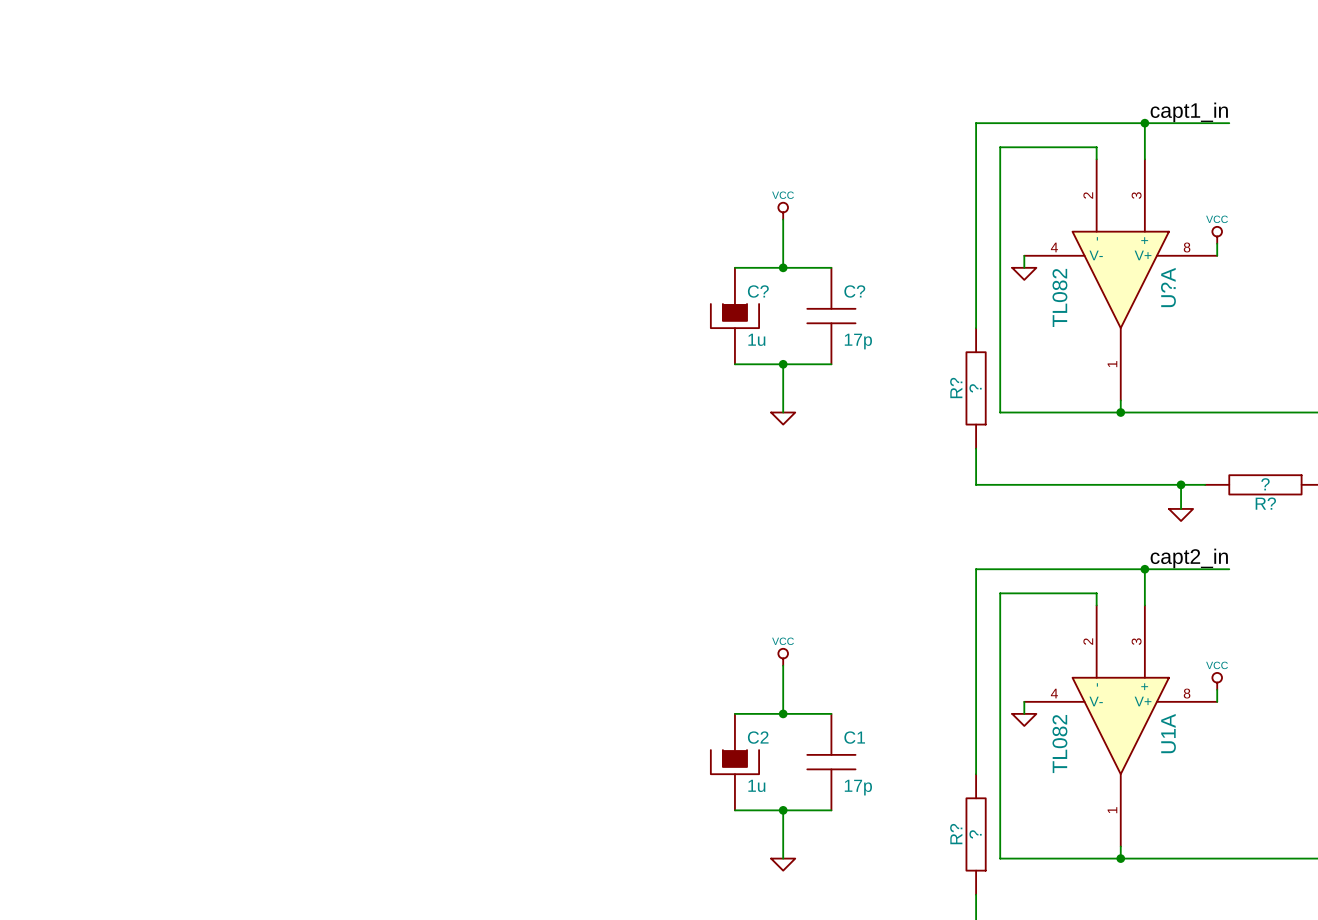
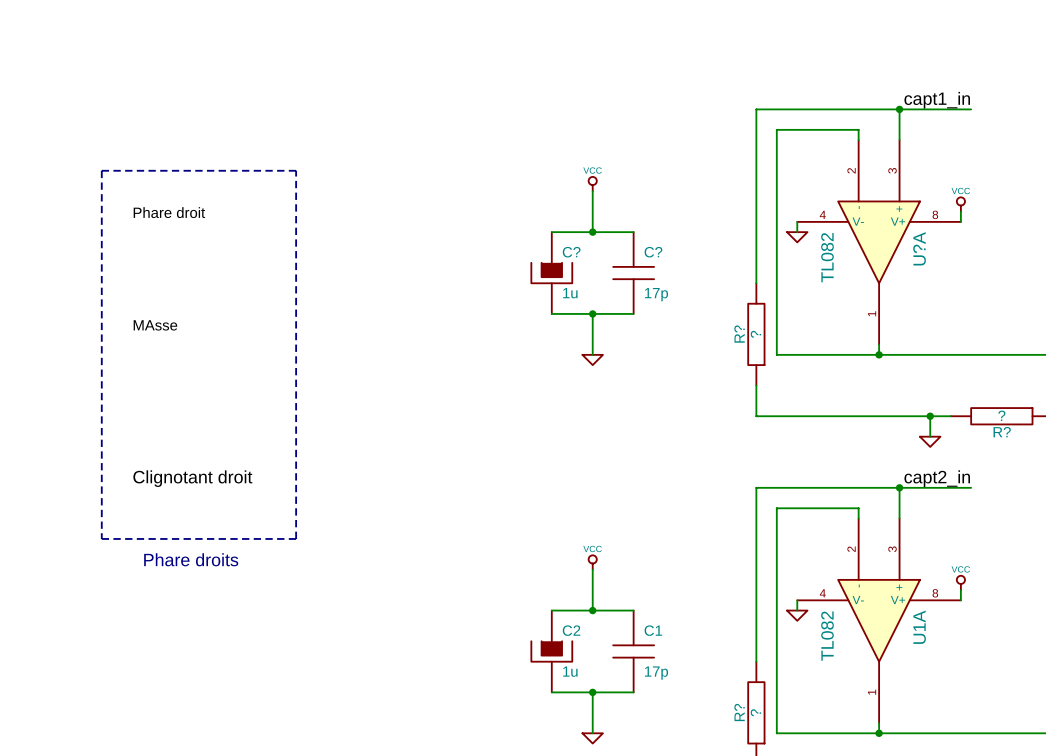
line: none -> (101, 170) (296, 170) (296, 538) (101, 538) (101, 170)
label: none -> Phare droit (169, 212)
label: none -> MAsse (155, 325)
label: none -> Clignotant droit (192, 478)
text: none -> Phare droits (191, 559)

